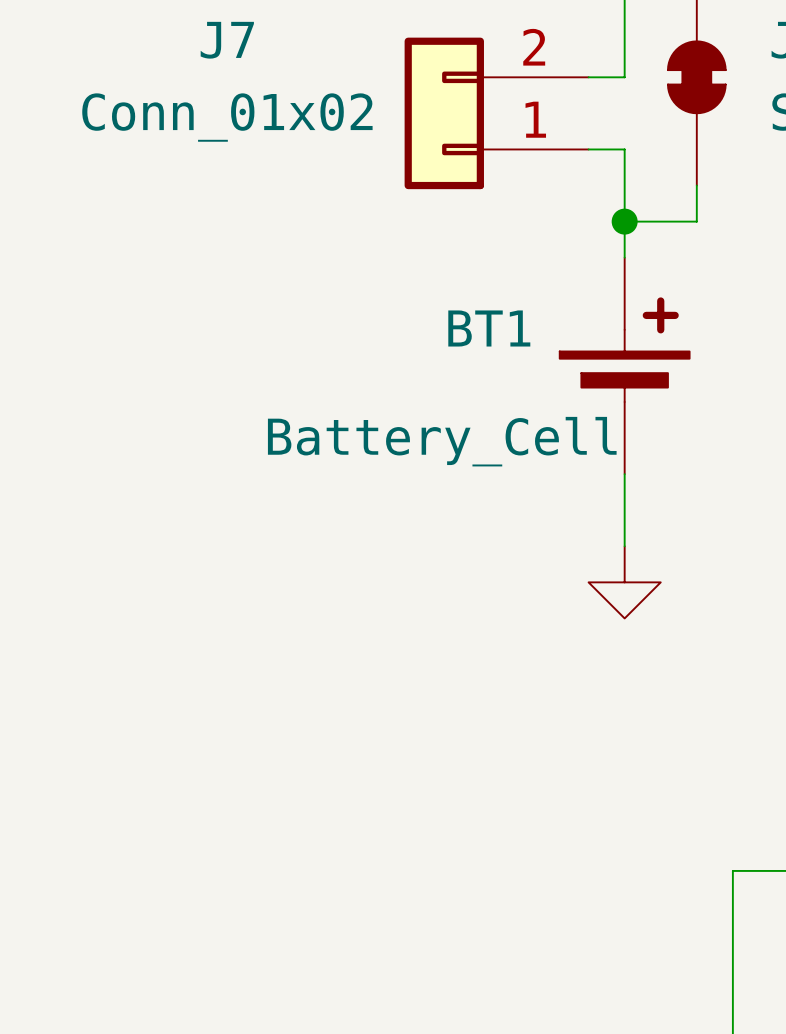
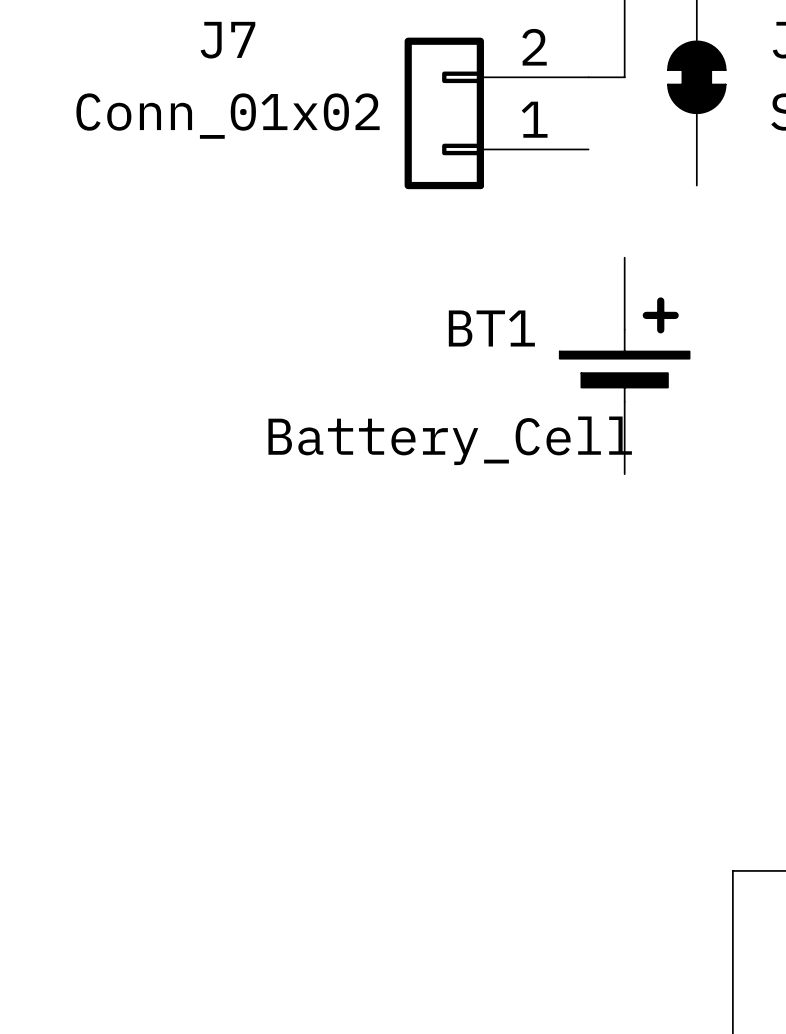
wire: (588, 149) (624, 149) (624, 257) -> none
wire: (696, 185) (696, 221) (624, 221) -> none
junction: (624, 221) -> none
wire: (624, 474) (624, 546) -> none
power symbol: (624, 582) -> none

